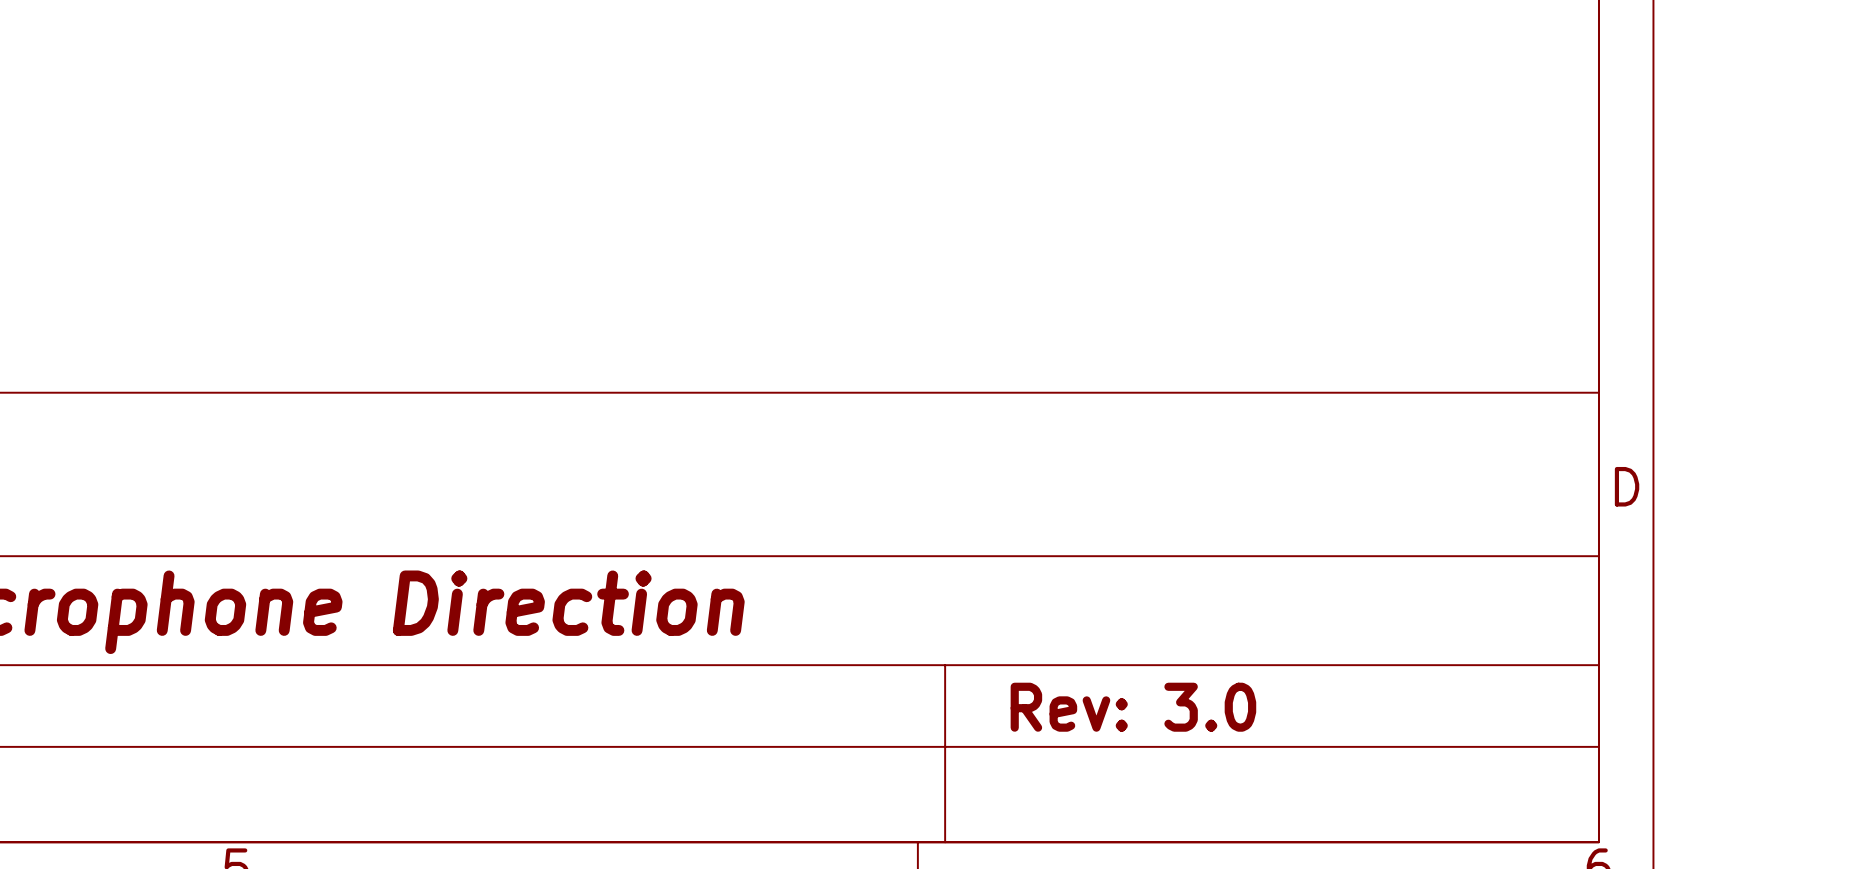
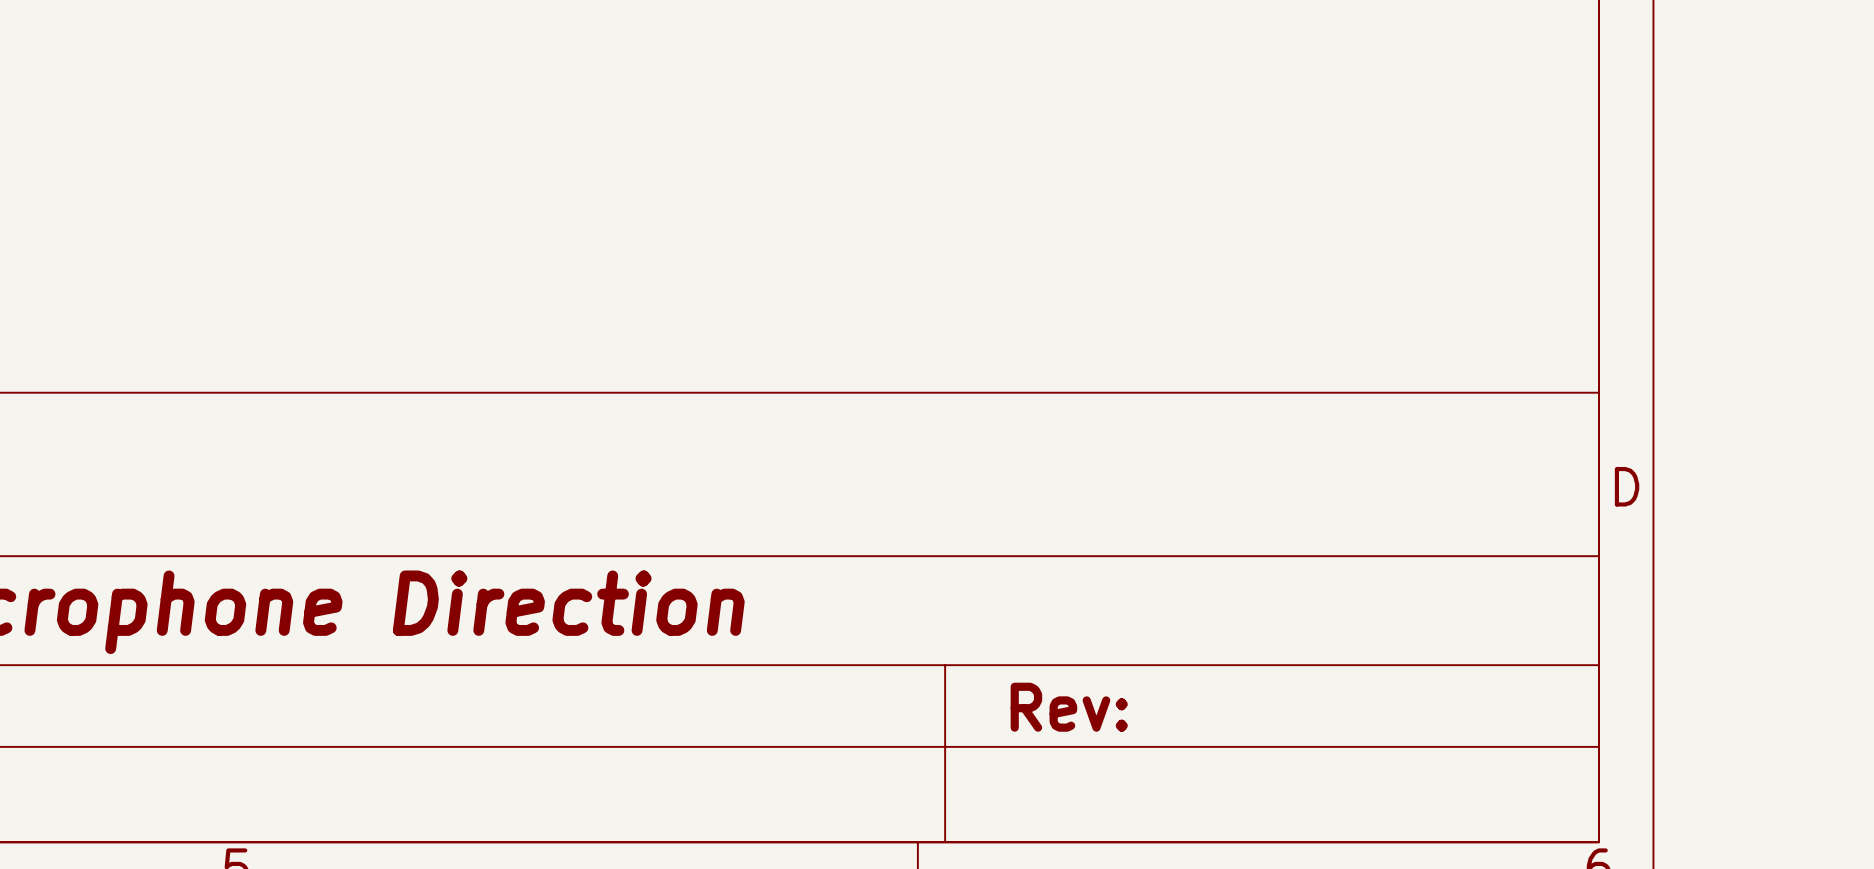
title block: Rev: 3.0 (1133, 707) -> Rev: (1069, 707)

